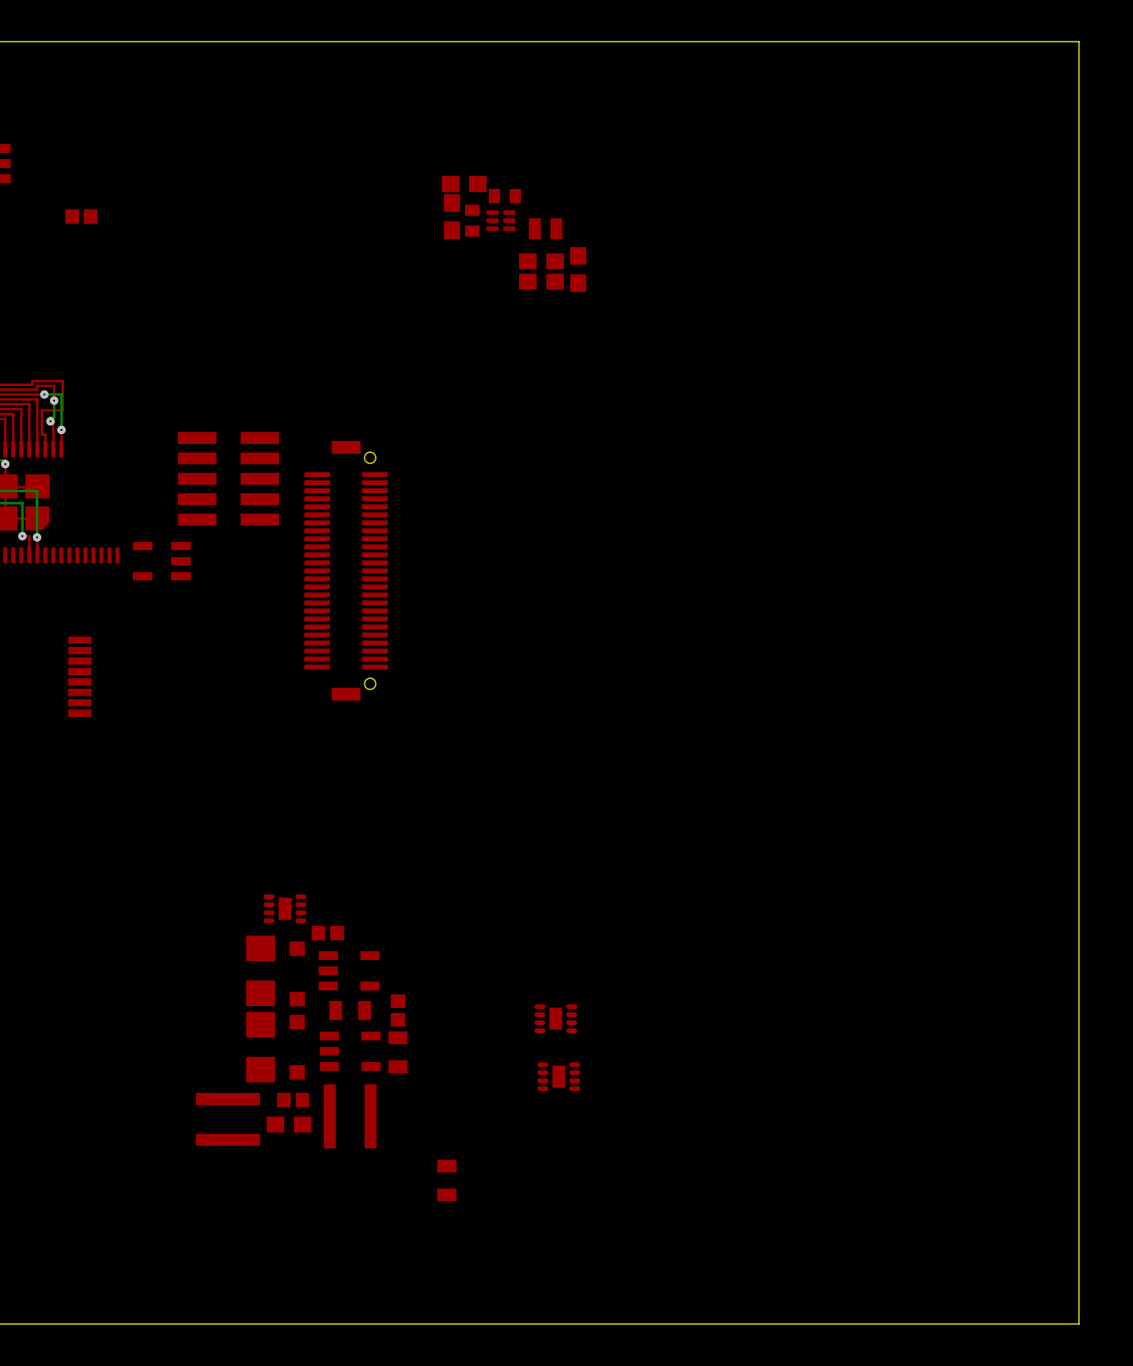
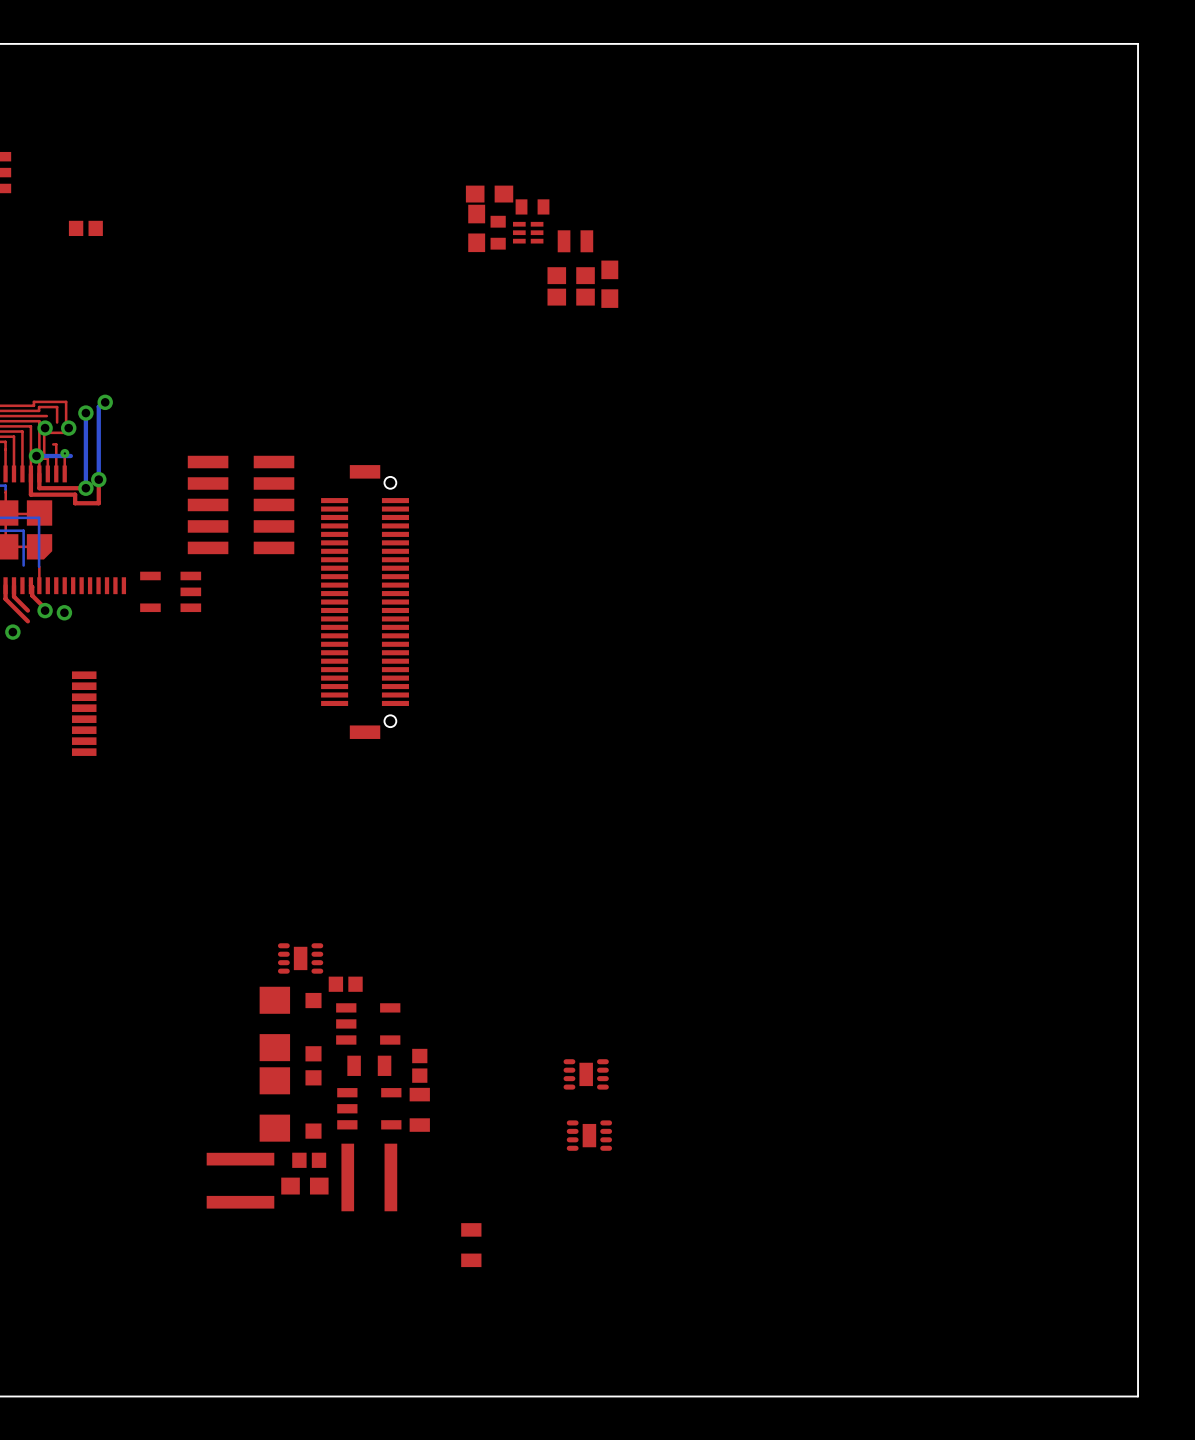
bottom track: none -> (105, 402) (105, 406) (98, 406) (98, 479)
via: none -> (105, 402)
bottom track: none -> (85, 413) (85, 488)
via: none -> (85, 413)
bottom track: (44, 394) (61, 394) (61, 429) -> none
via: (44, 394) -> none
bottom track: (54, 400) (54, 417) (50, 417) (50, 421) -> none
via: (54, 400) -> none
via: none -> (45, 428)
via: none -> (68, 428)
via: (50, 421) -> none
via: none -> (36, 456)
bottom track: none -> (70, 456) (36, 456)
top track: none -> (30, 473) (30, 494) (75, 494) (75, 503) (98, 503) (98, 479)
top track: none -> (39, 473) (39, 488) (85, 488)
via: none -> (98, 479)
via: none -> (85, 488)
via: (5, 464) -> none
top track: (22, 536) (29, 536) (29, 555) -> (45, 610) (32, 595) (30, 585)
via: (22, 536) -> none
via: (37, 537) -> none
top track: none -> (5, 585) (5, 598) (27, 621)
top track: none -> (14, 585) (14, 596) (27, 610)
via: none -> (45, 610)
via: none -> (64, 612)
via: none -> (12, 632)

